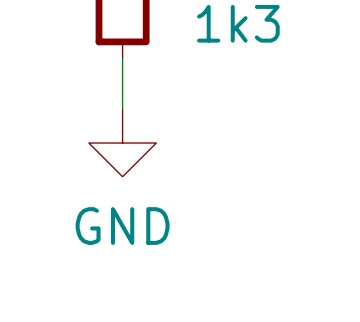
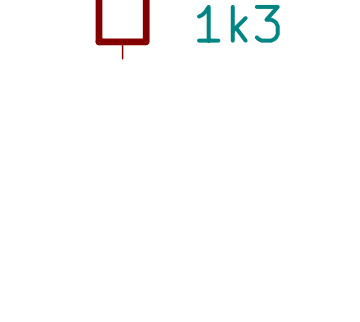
wire: (122, 58) (122, 109) -> none
power symbol: GND (122, 143) -> none

